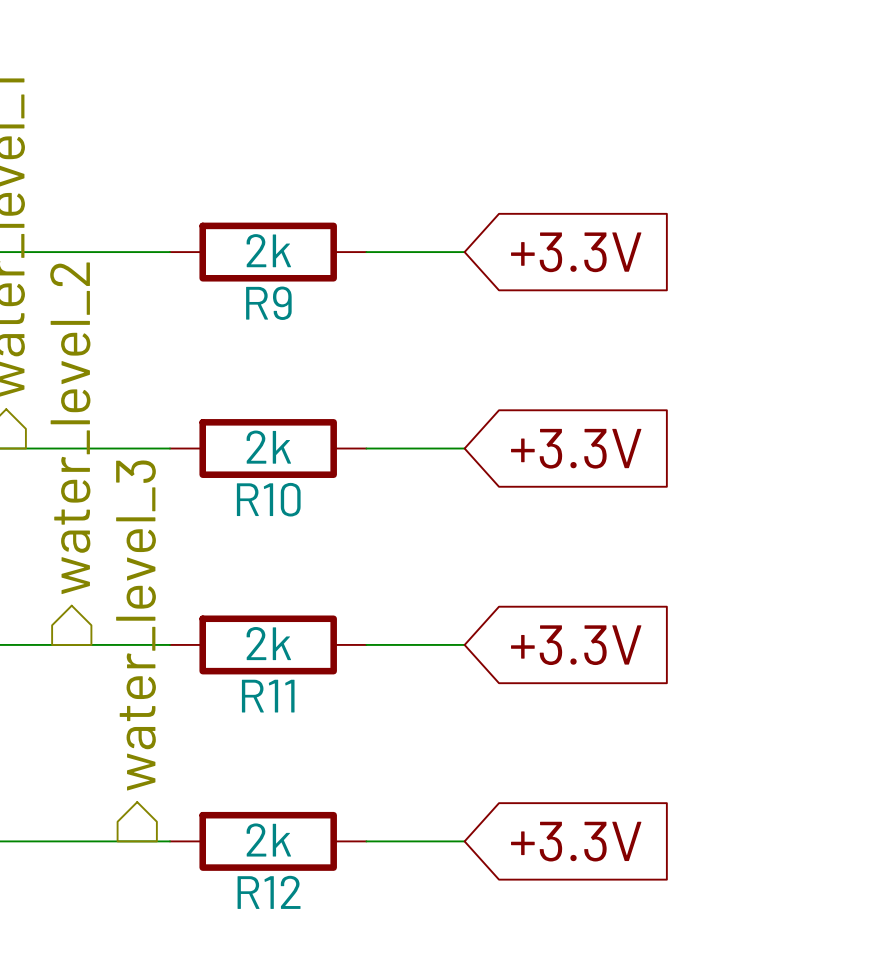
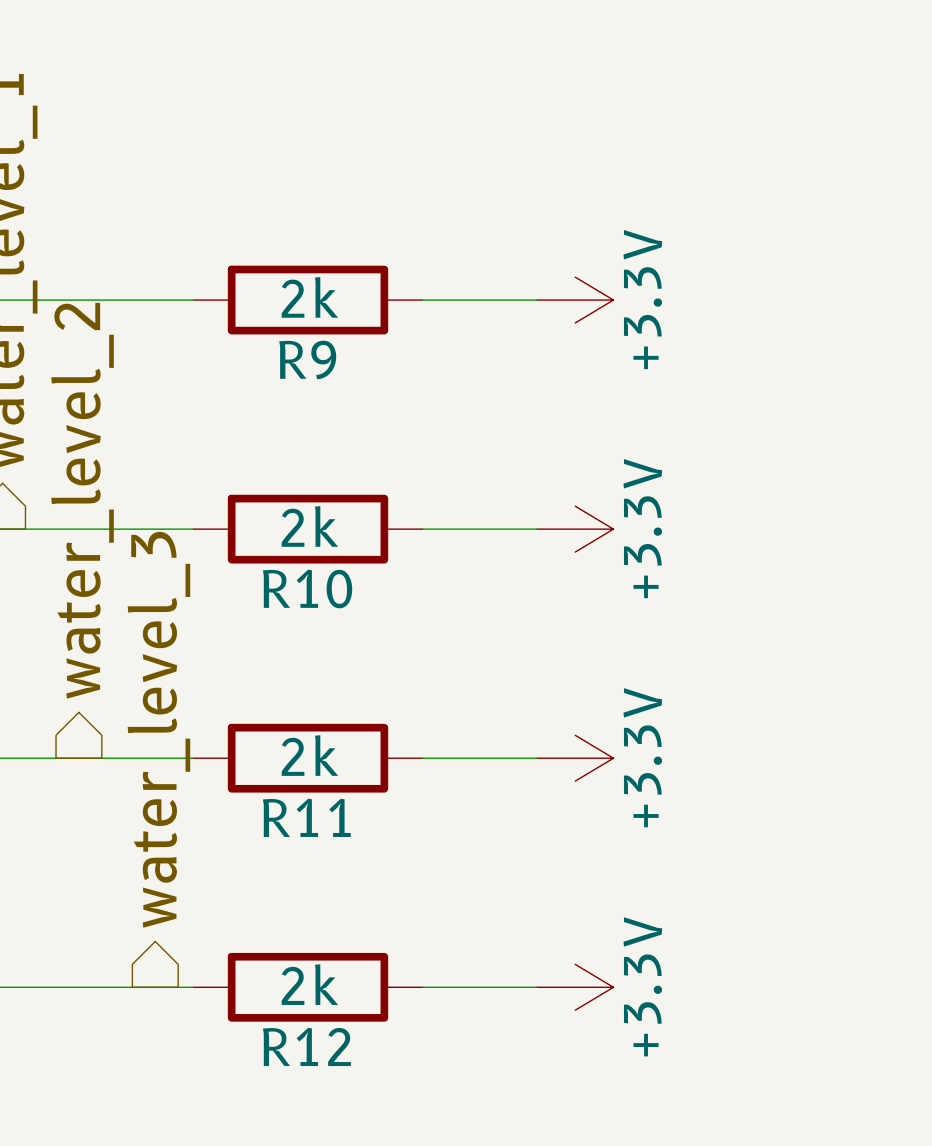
power symbol: none -> +3.3V (575, 300)
global label: +3.3V (576, 252) -> none
power symbol: none -> +3.3V (575, 529)
global label: +3.3V (576, 448) -> none
power symbol: none -> +3.3V (575, 758)
global label: +3.3V (576, 645) -> none
power symbol: none -> +3.3V (575, 987)
global label: +3.3V (576, 841) -> none

